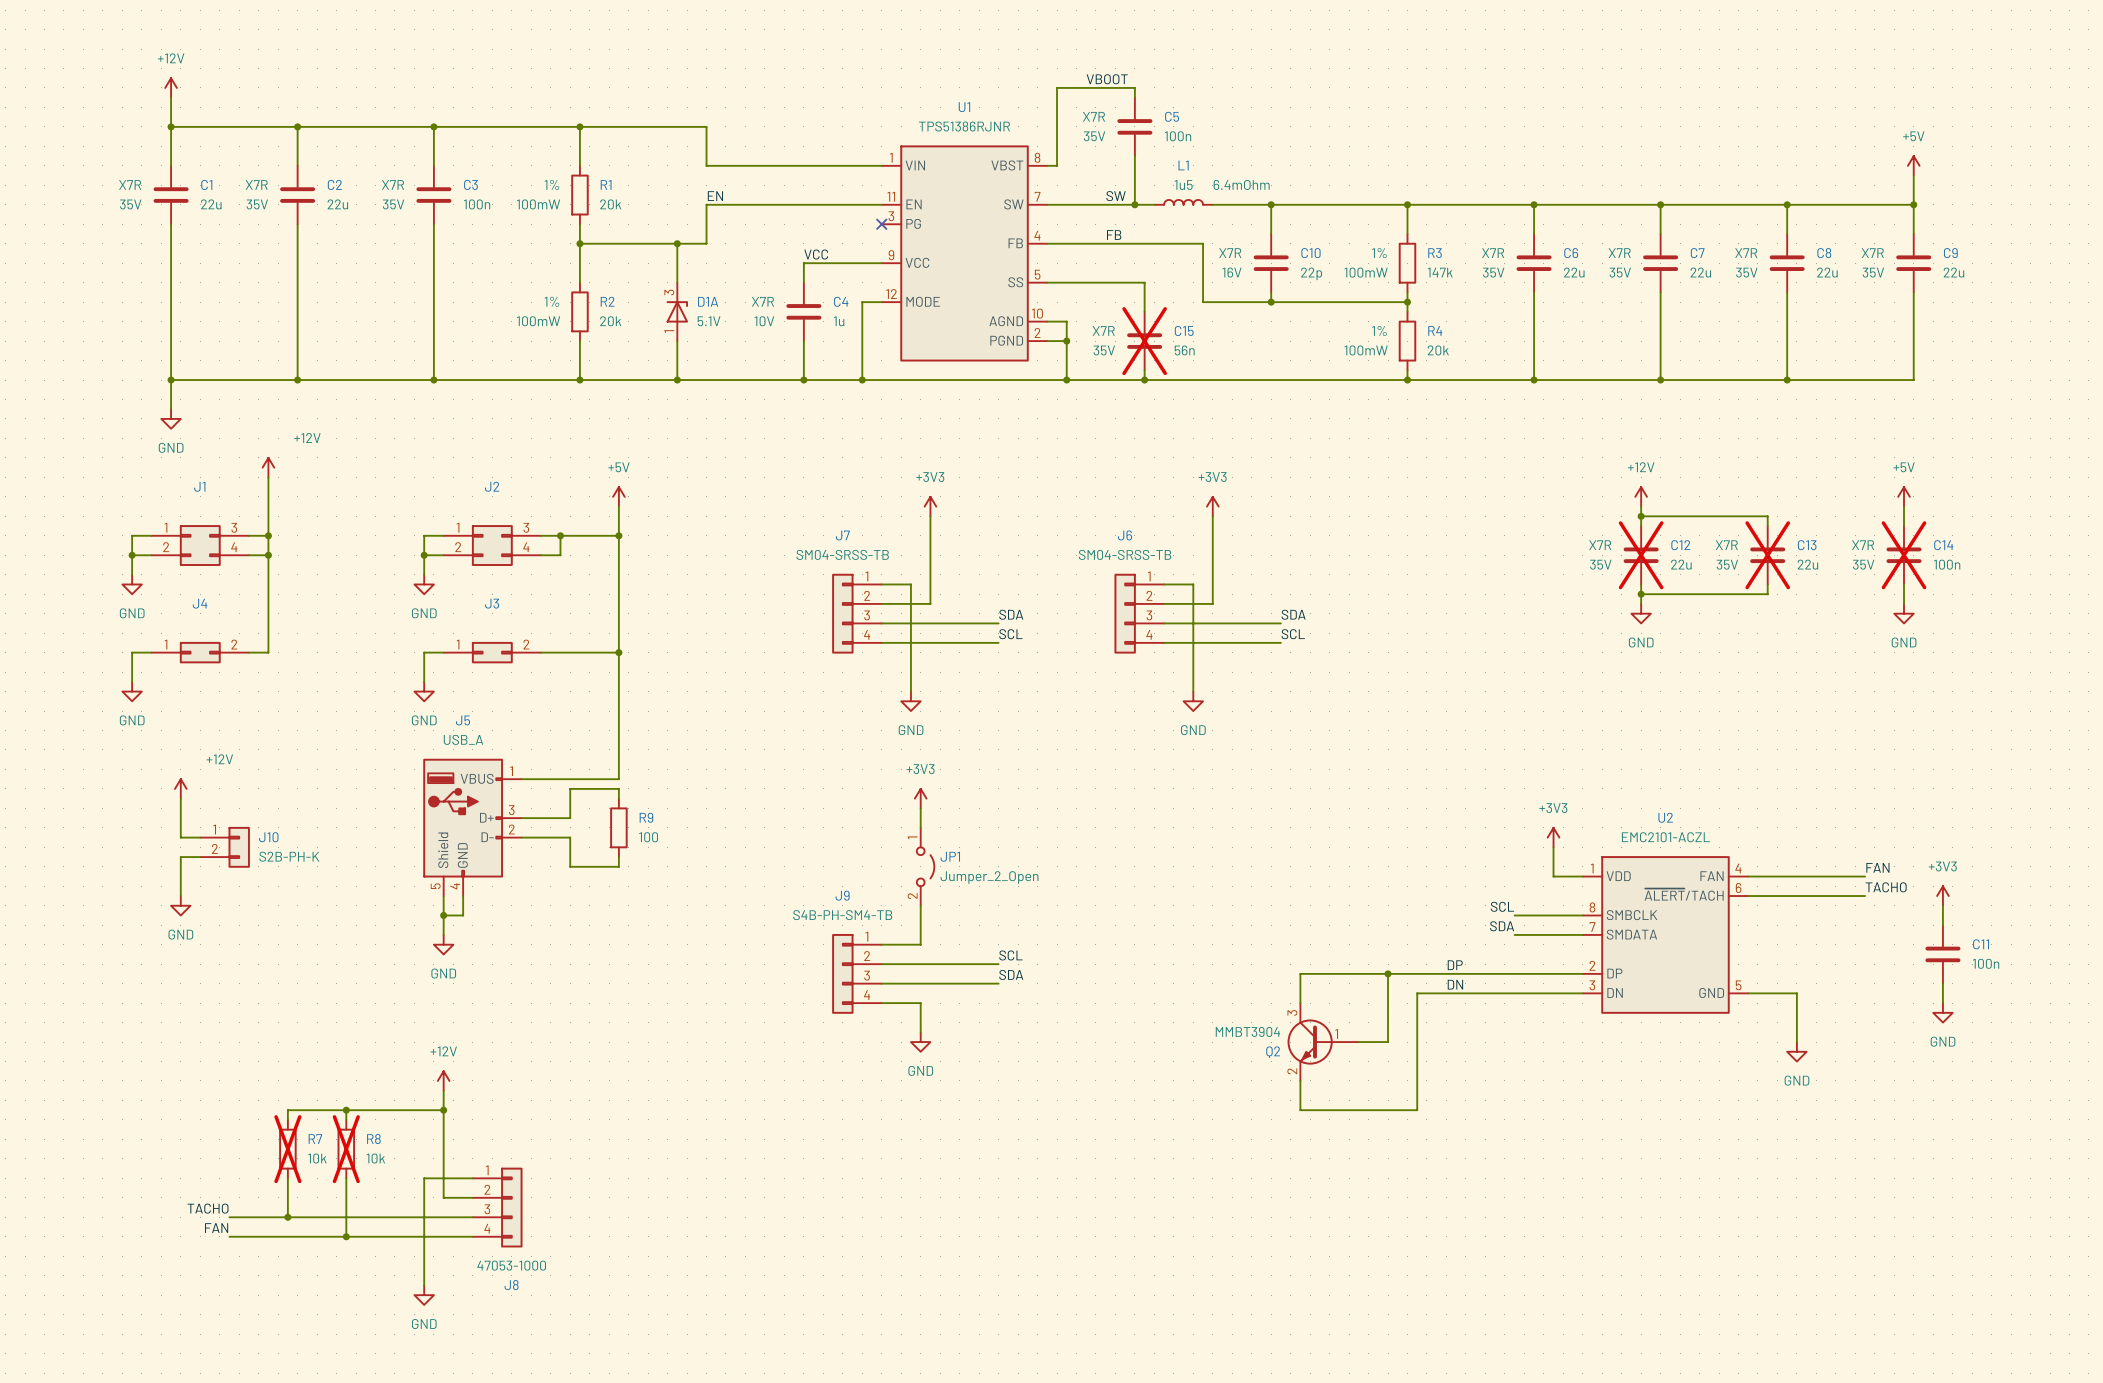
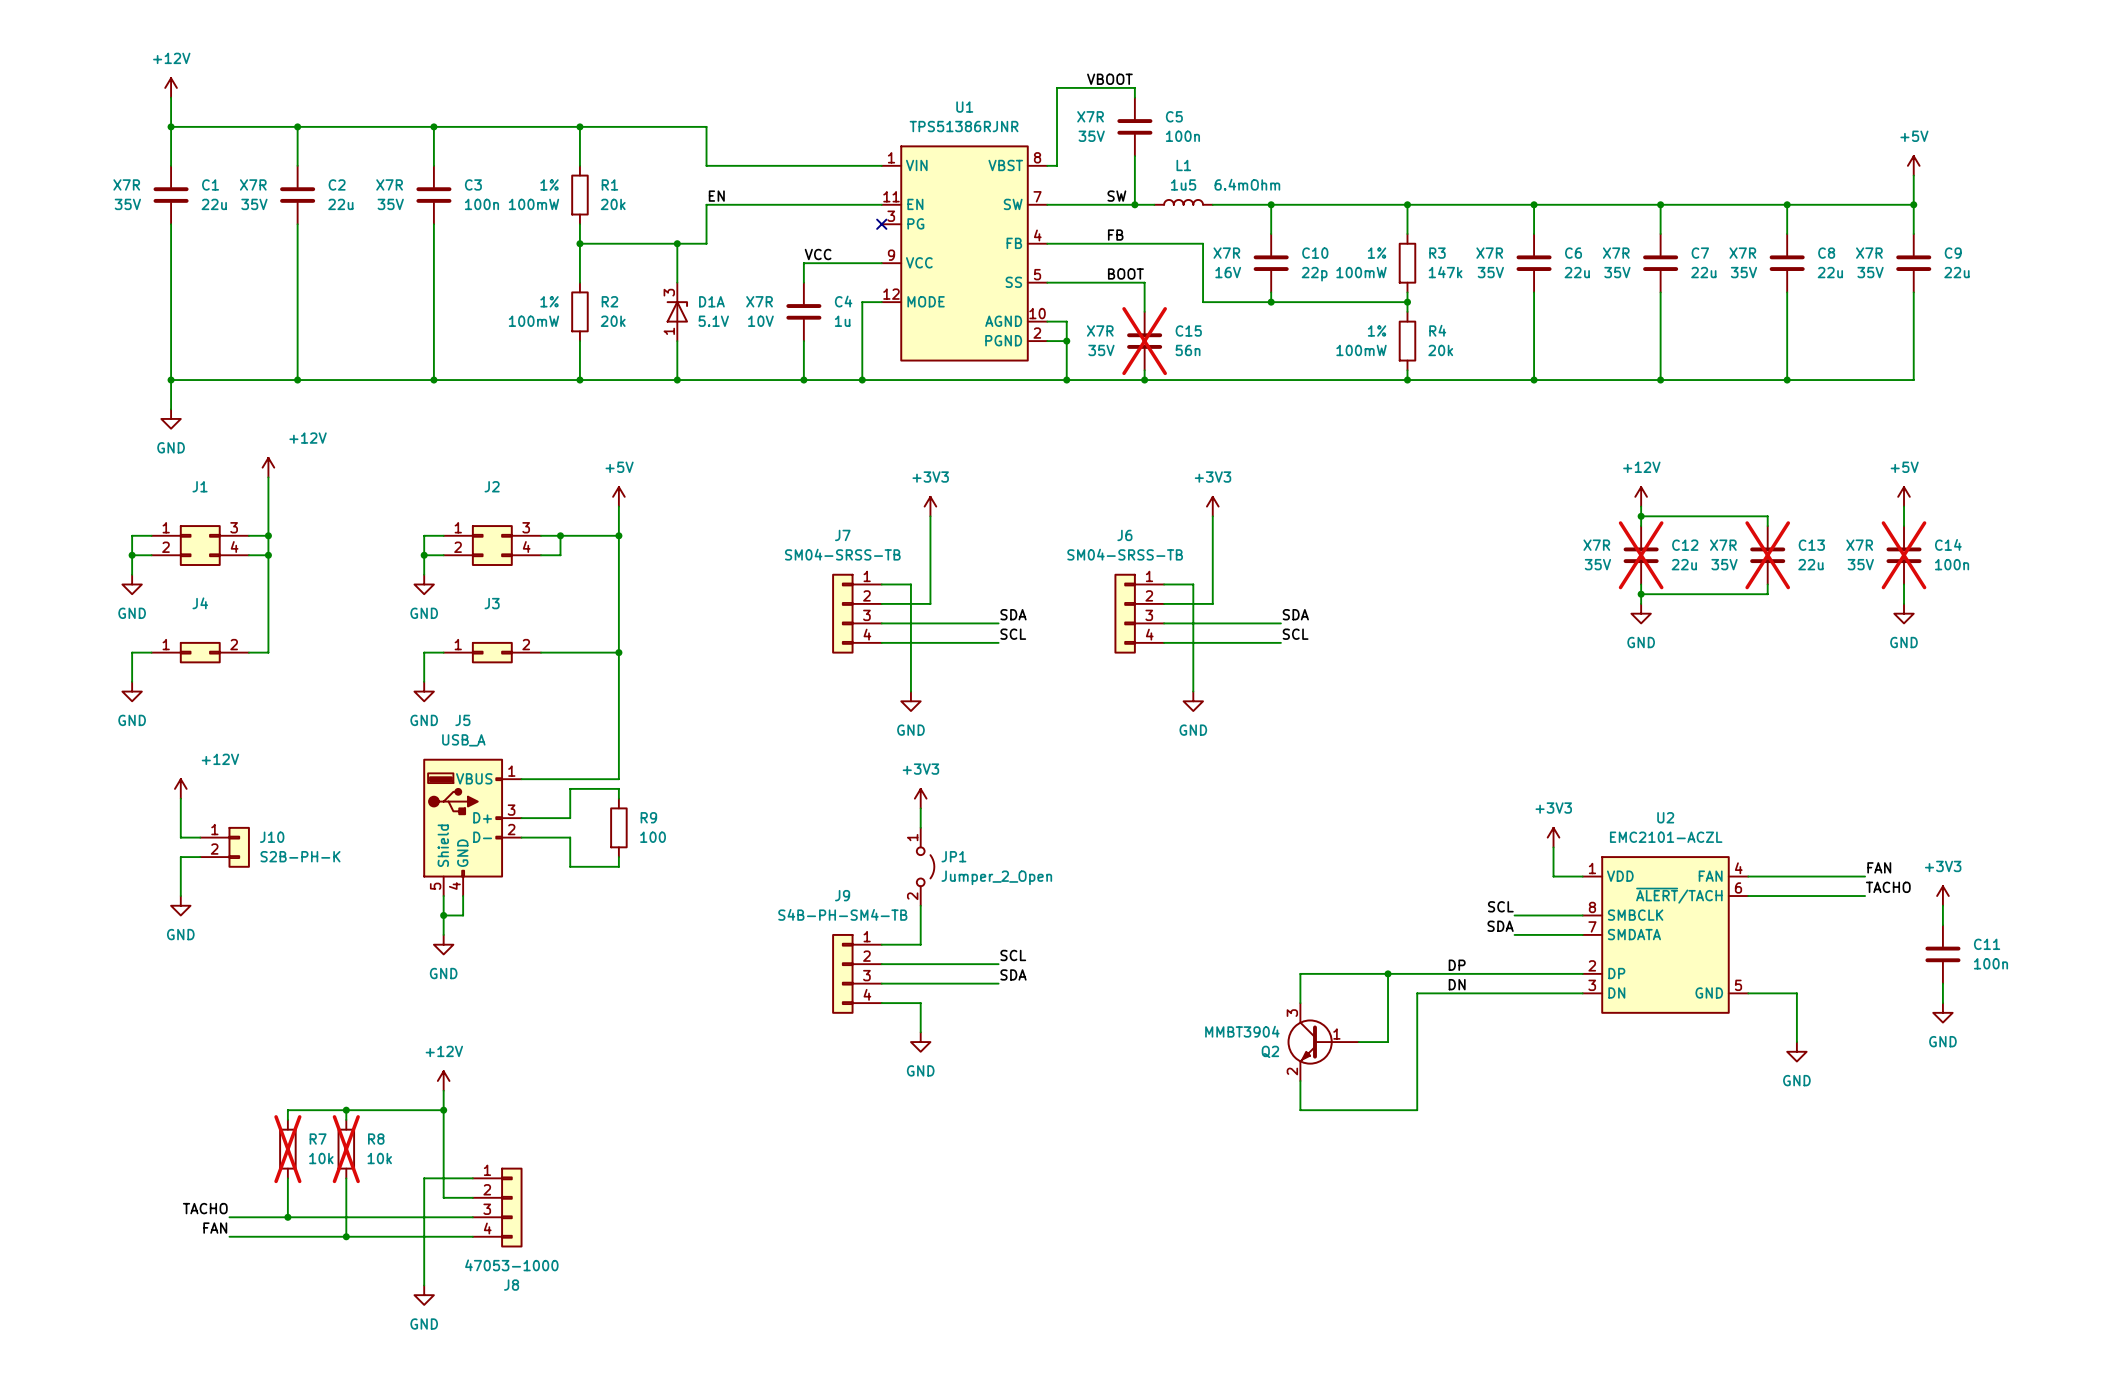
label: none -> BOOT (1125, 273)

